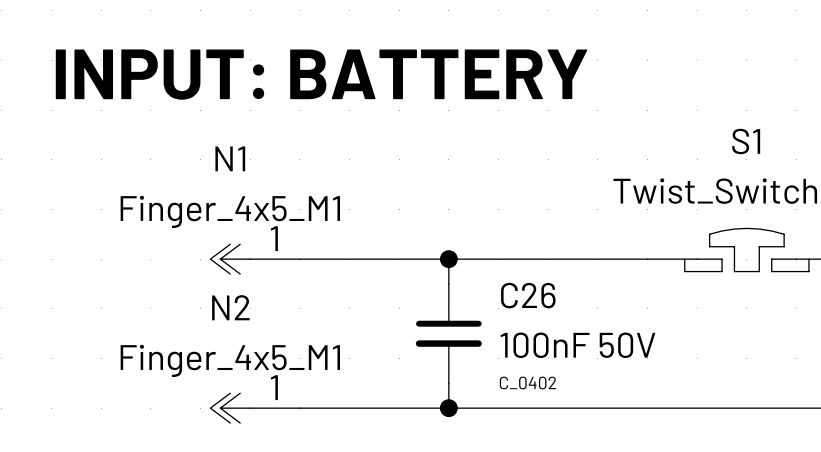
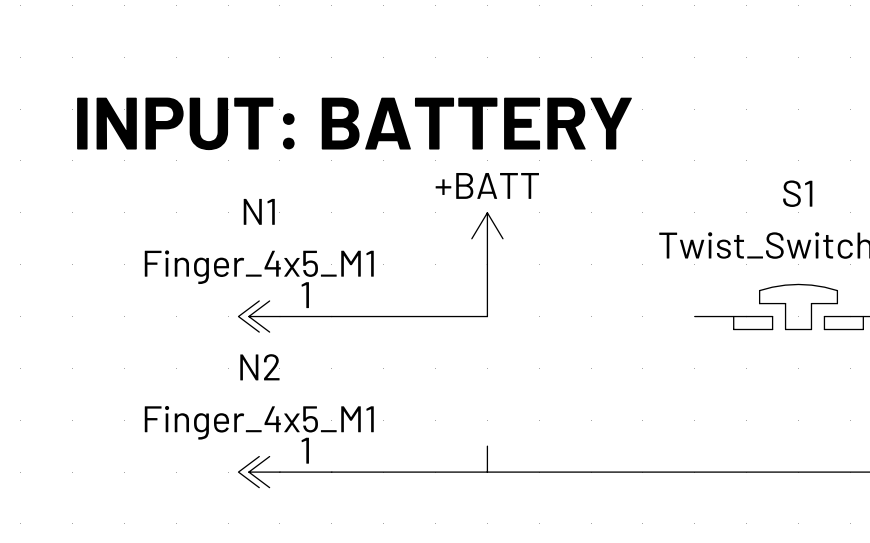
power symbol: none -> +BATT (487, 238)
wire: none -> (487, 264) (487, 316)
junction: (448, 259) -> none
wire: (647, 259) (448, 259) (448, 283) -> none
C26: 100nF 50V (448, 333) -> none
junction: (448, 408) -> none

